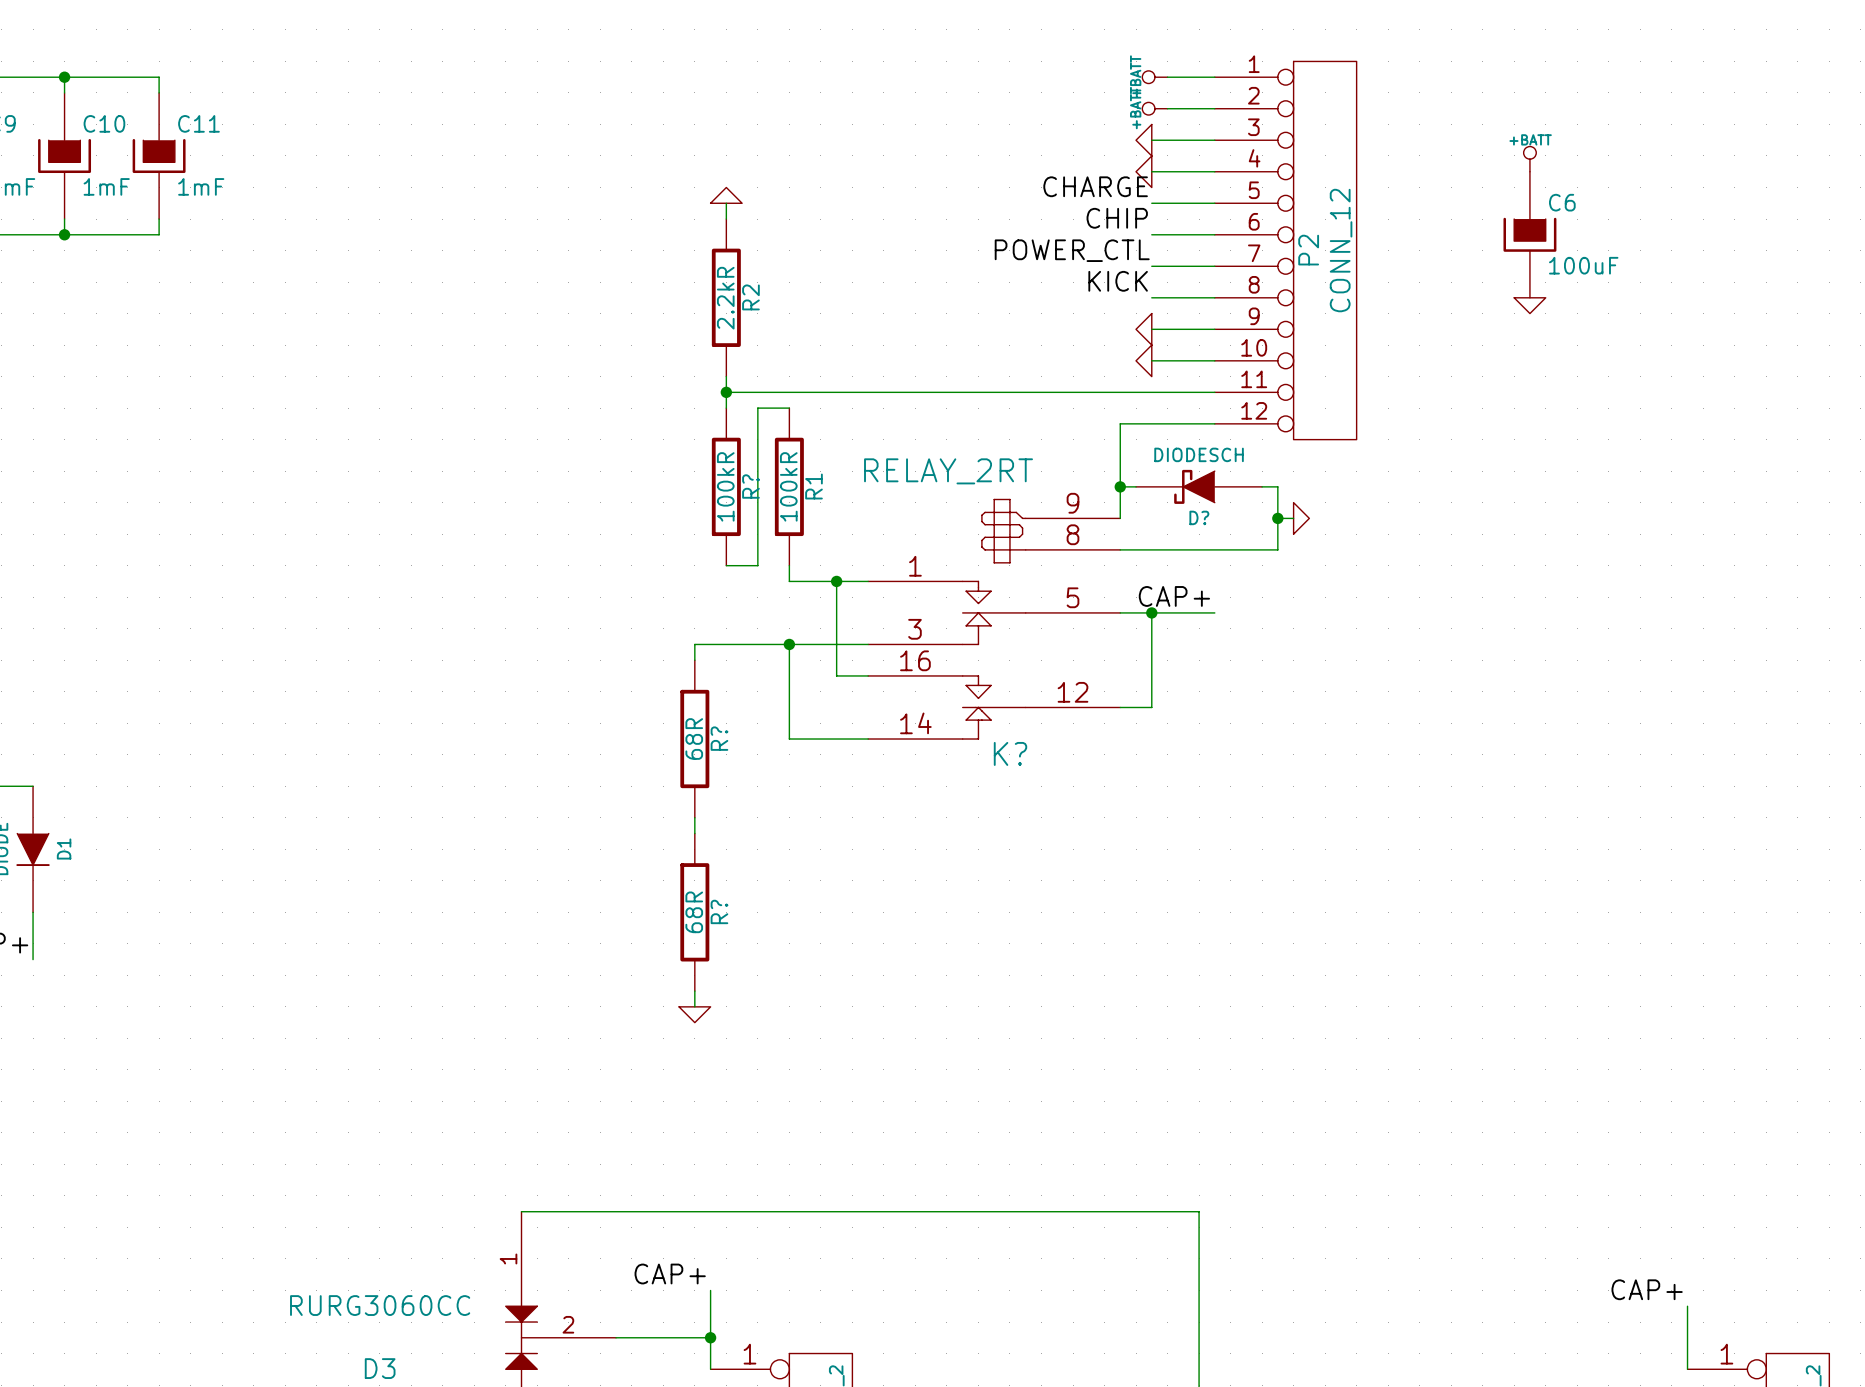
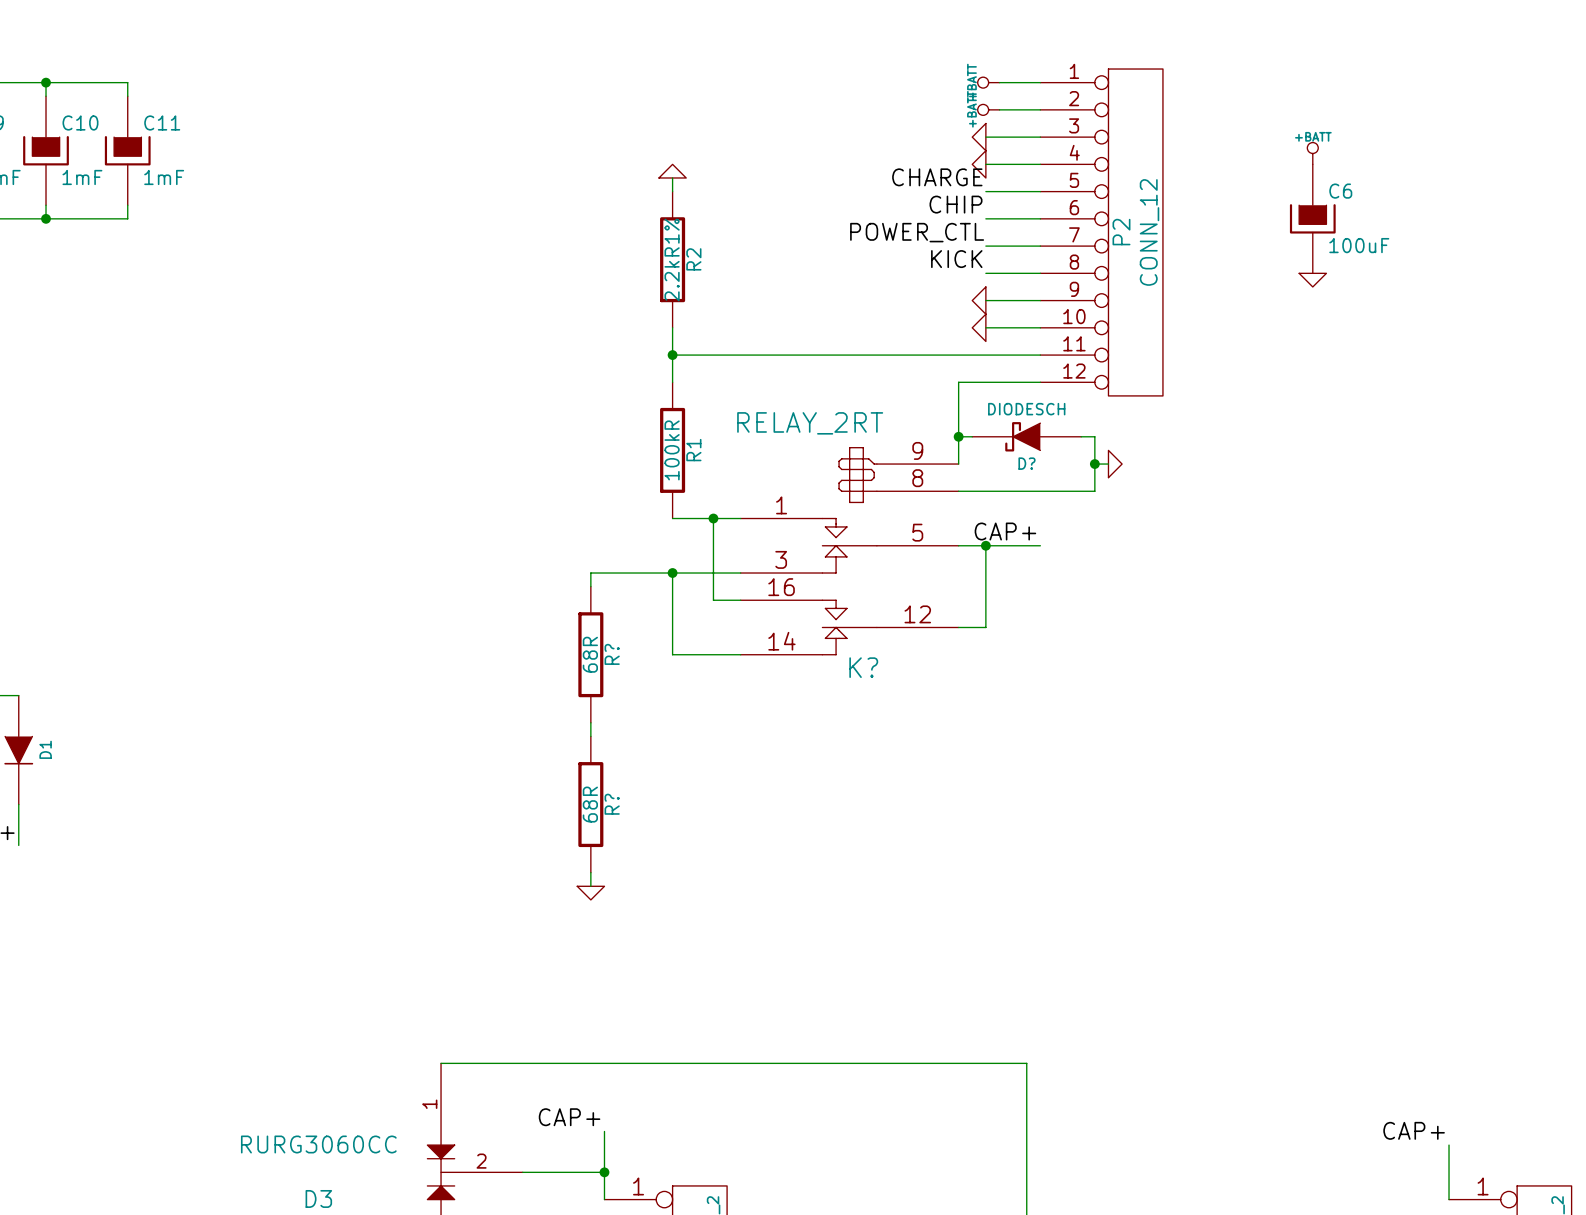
power symbol position: (726, 195) -> (672, 171)
wire: (726, 203) (726, 219) -> (672, 177) (672, 191)
R2 position: (726, 297) -> (672, 259)
R2 value: 2.2kR (725, 298) -> 2.2kR1% (672, 260)
wire: none -> (672, 327) (672, 382)
wire: (726, 376) (726, 408) -> none
wire: (726, 392) (789, 392) -> none
junction position: (726, 392) -> (672, 355)
wire: (789, 408) (757, 408) (757, 565) (726, 565) -> none
R?: 100kR (726, 486) -> none
R1 position: (789, 486) -> (672, 450)

